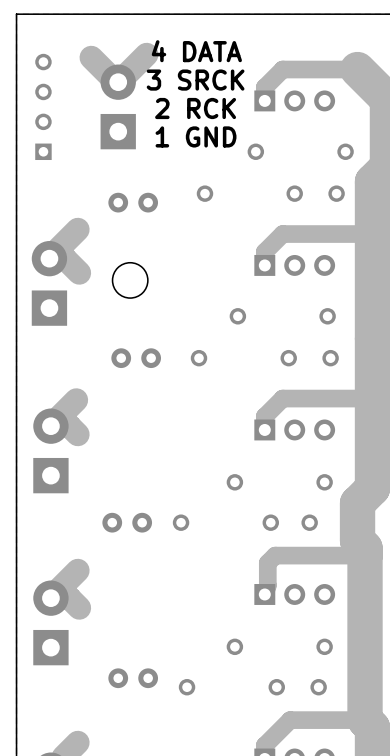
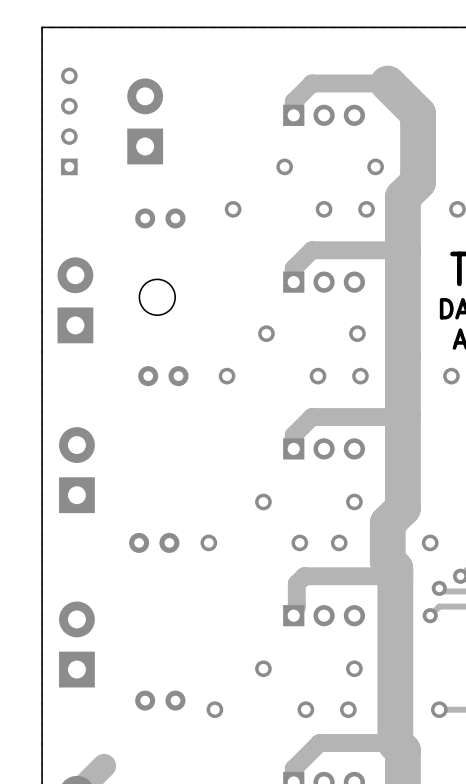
text: 4 DATA (196, 51) -> none
track: (146, 54) (119, 82) (115, 82) (91, 57) -> none
text: 3 SRCK (195, 80) -> none
text: 2 RCK (195, 108) -> none
text: 1 GND (196, 136) -> none
track: (77, 229) (49, 258) (65, 258) (79, 272) -> none
track: (76, 400) (50, 426) (69, 426) (77, 434) -> none
track: (77, 570) (50, 598) (69, 598) (79, 607) -> none

